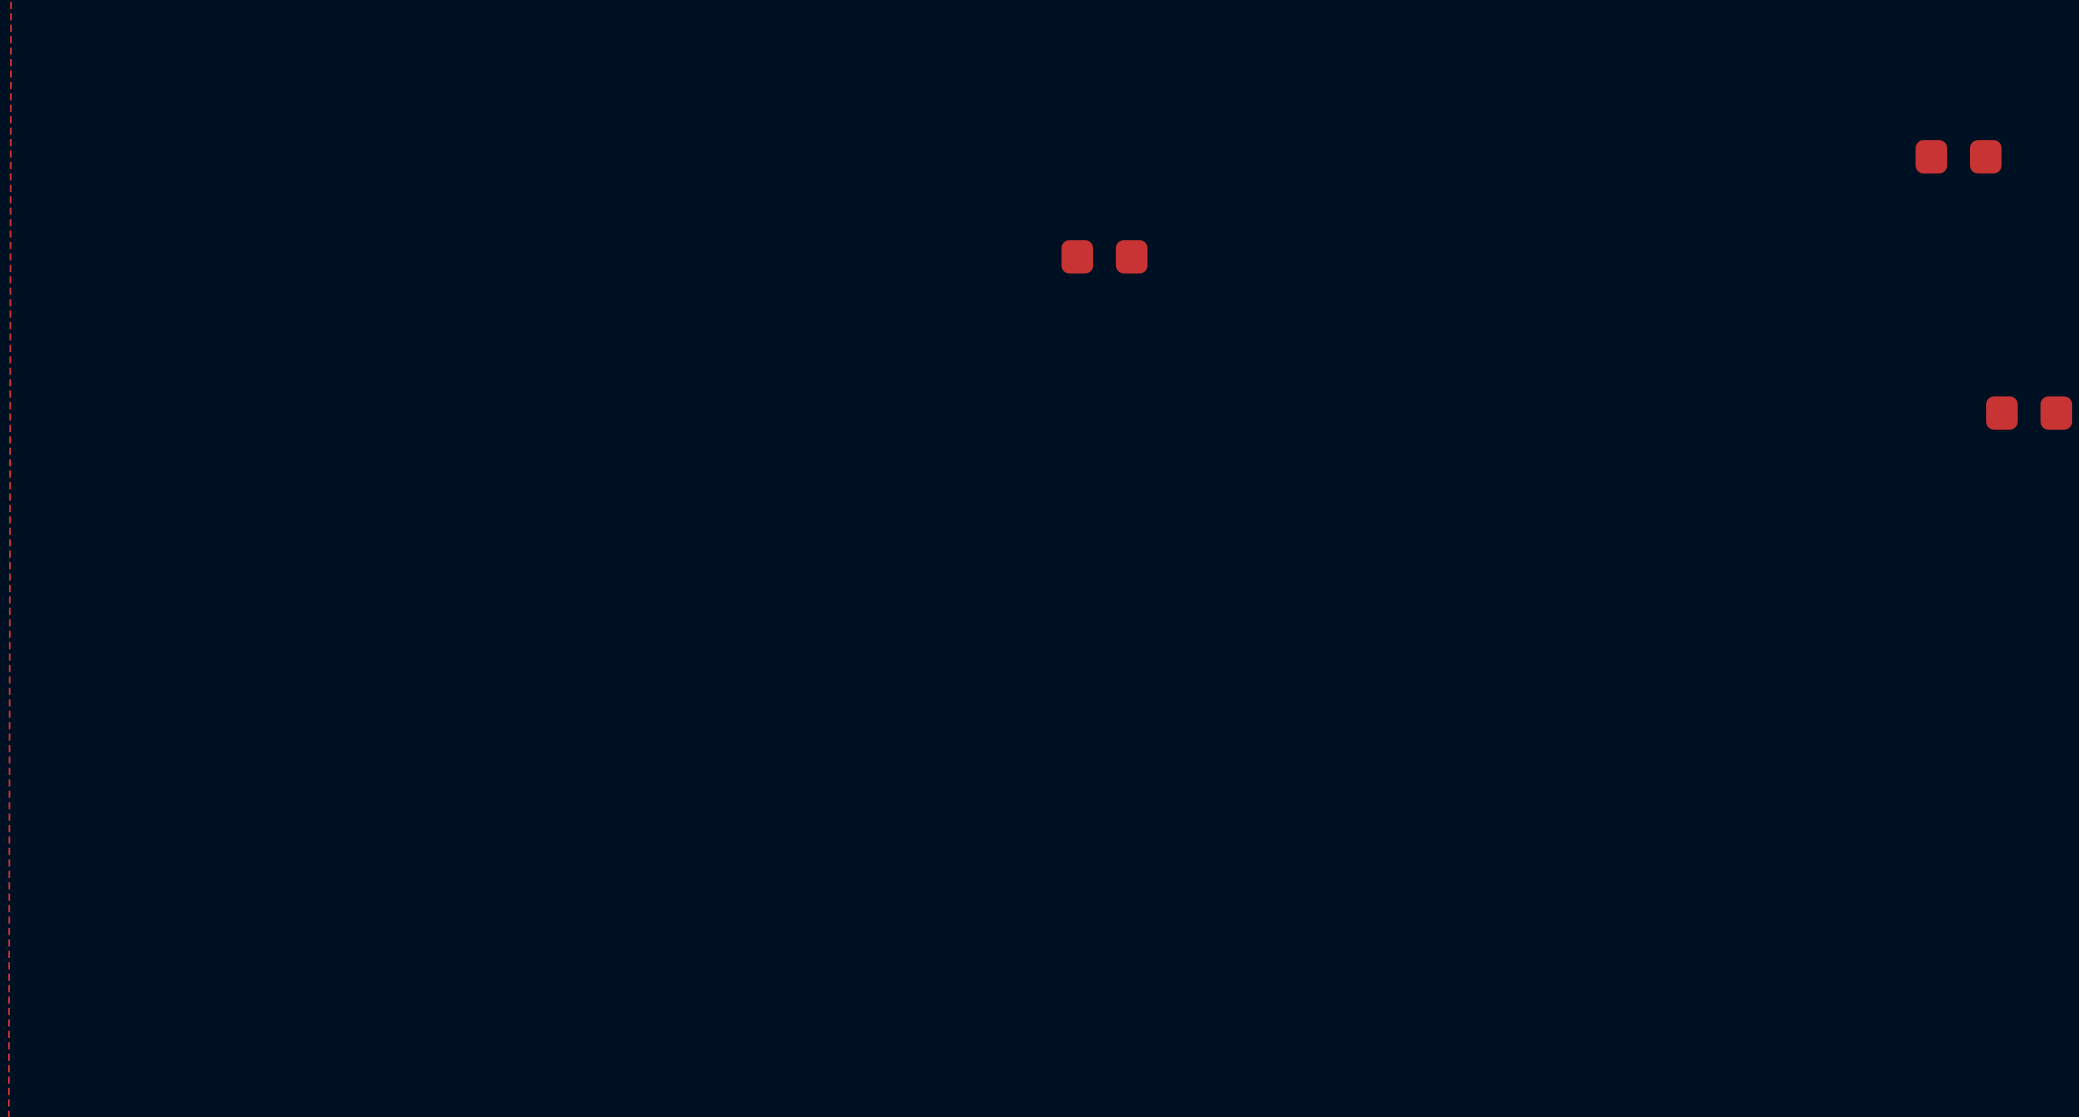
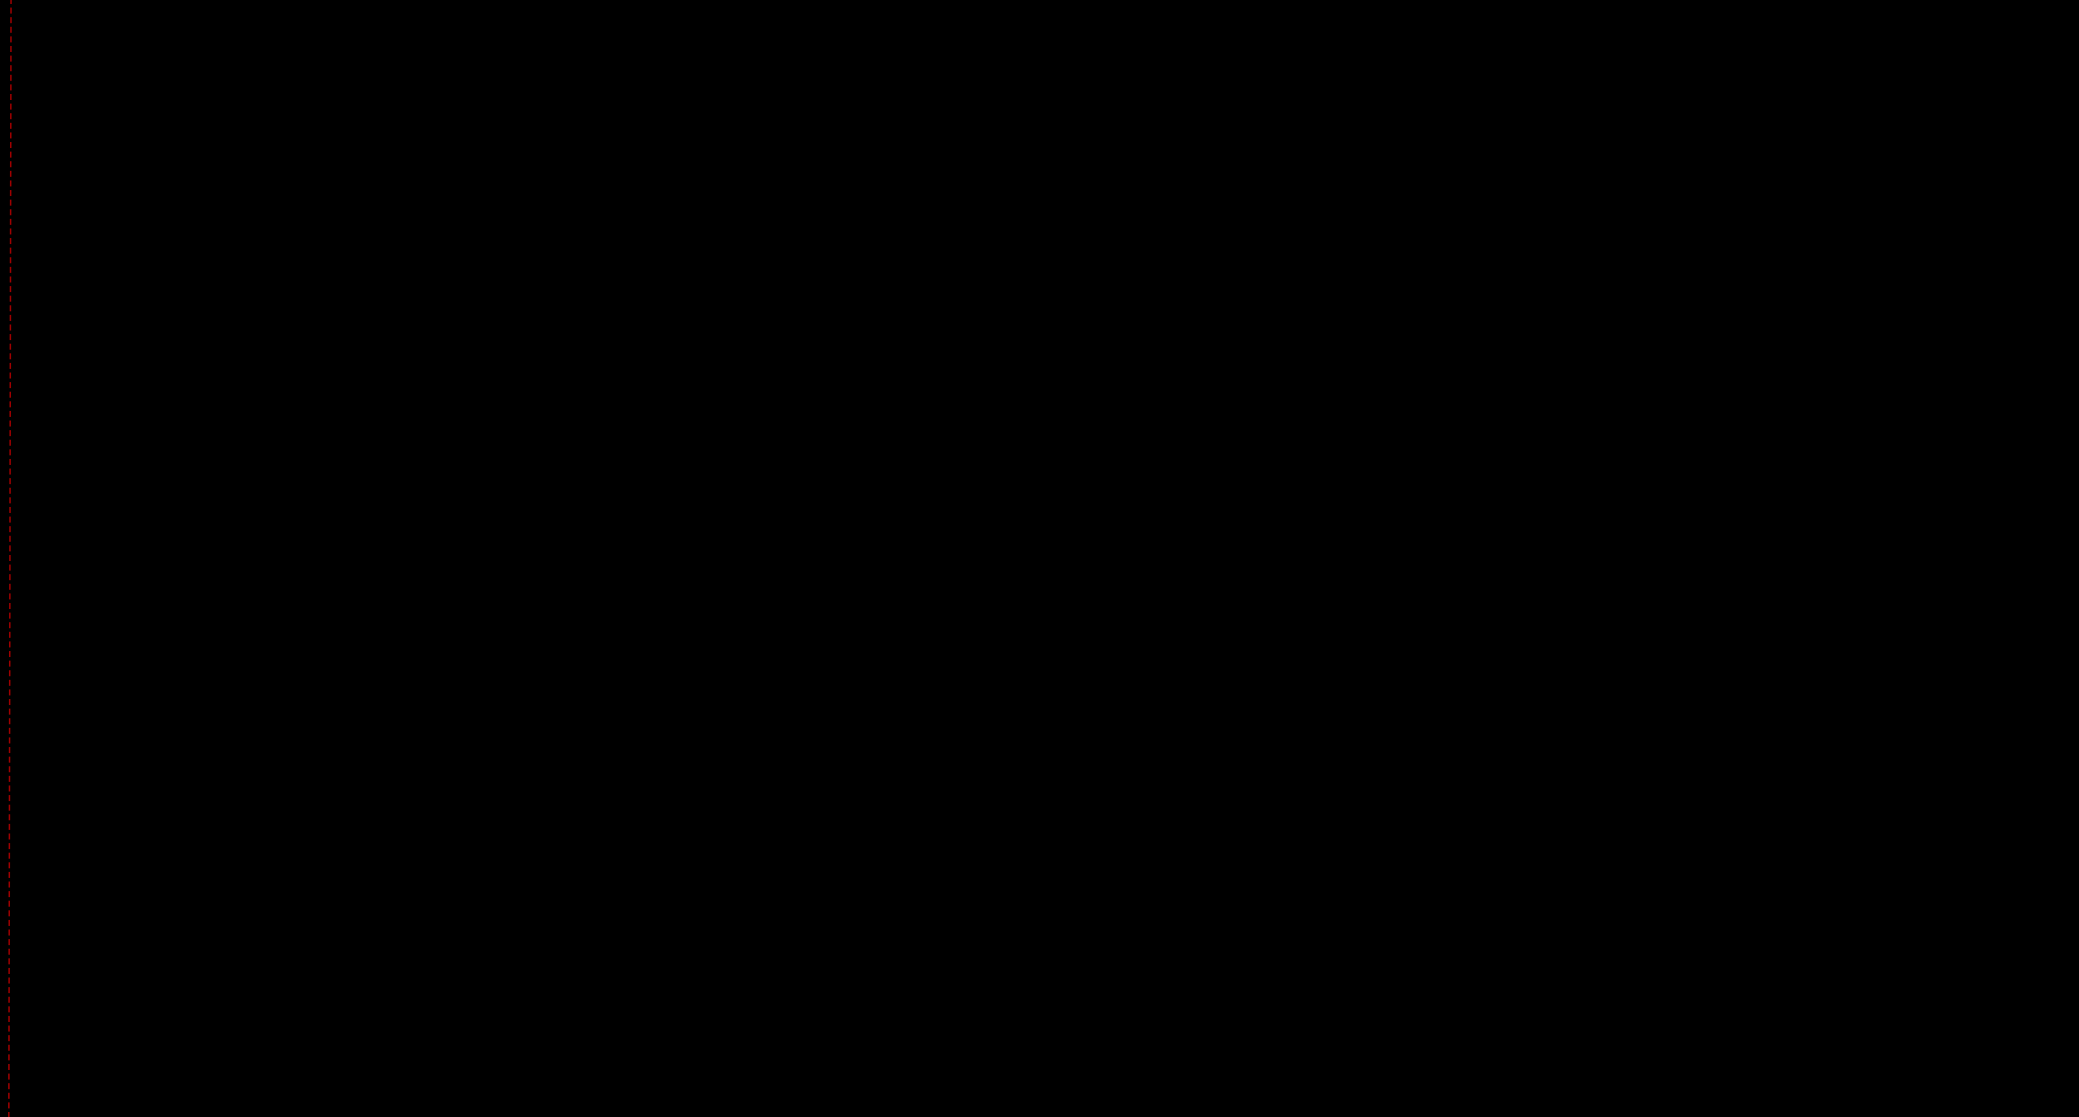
part: (1958, 156) -> none
part: (1104, 256) -> none
part: (2029, 413) -> none

